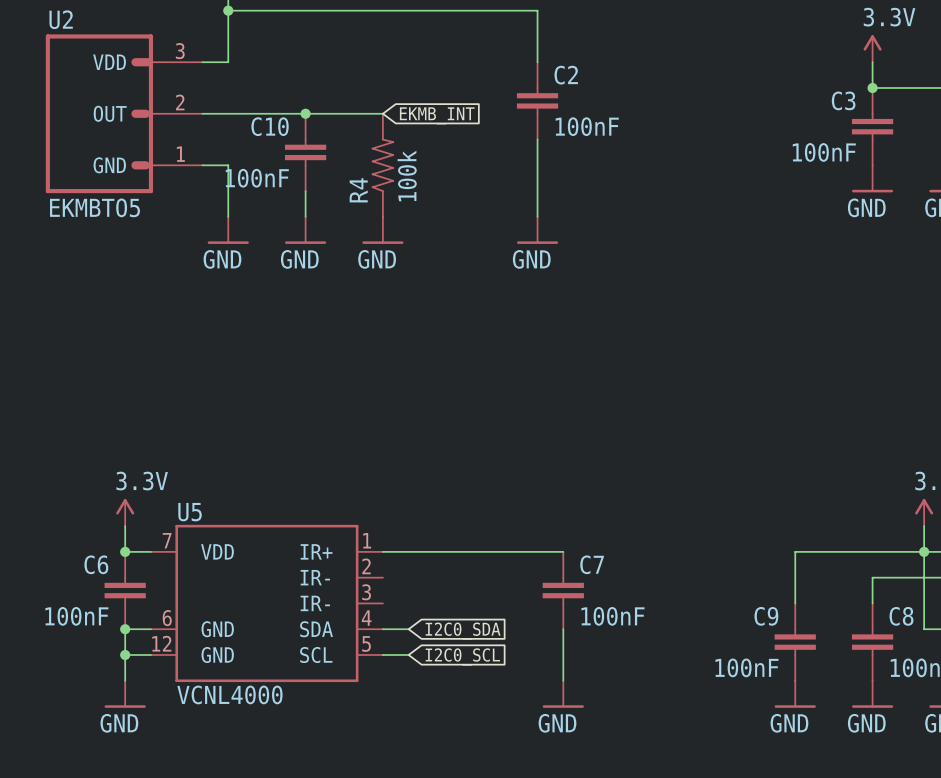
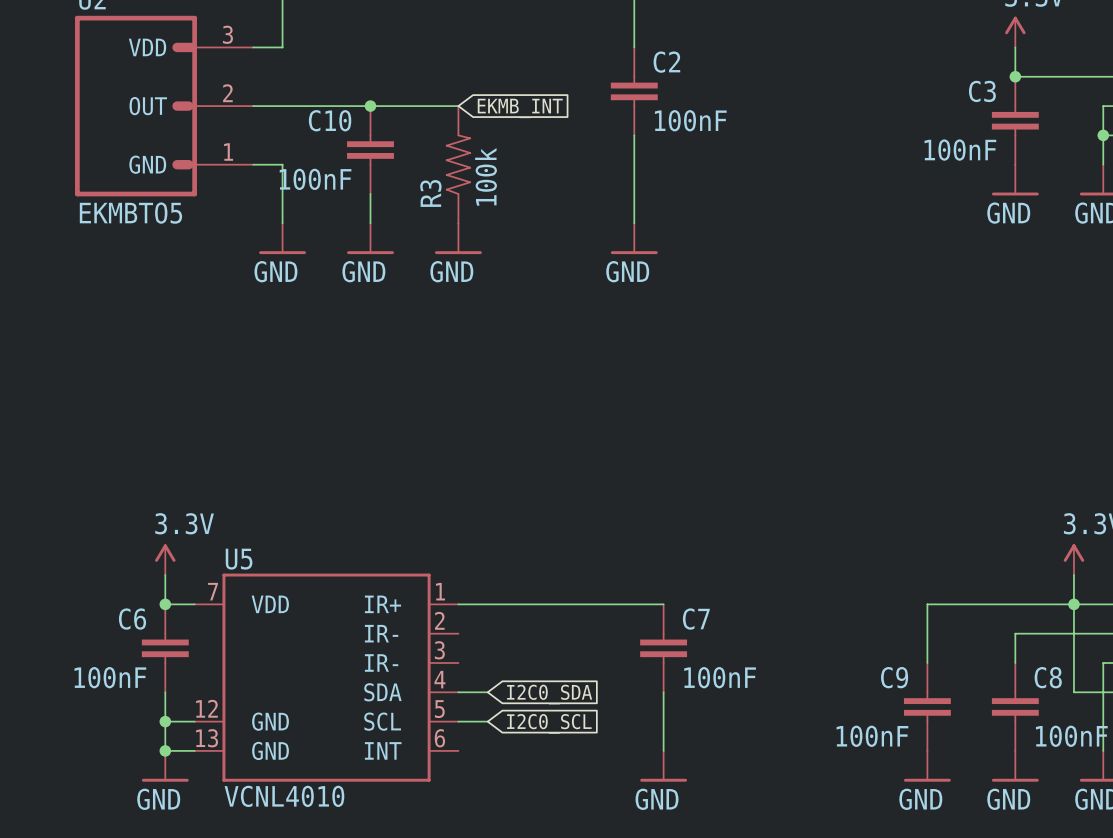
R4 name: R4 (358, 190) -> R3 (430, 193)
U5 symbol: [150, 524, 383, 683] -> [194, 573, 459, 782]
wire: (125, 629) (150, 629) -> (165, 750) (194, 750)
junction position: (125, 629) -> (165, 750)
U5 value: VCNL4000 (229, 694) -> VCNL4010 (284, 796)

